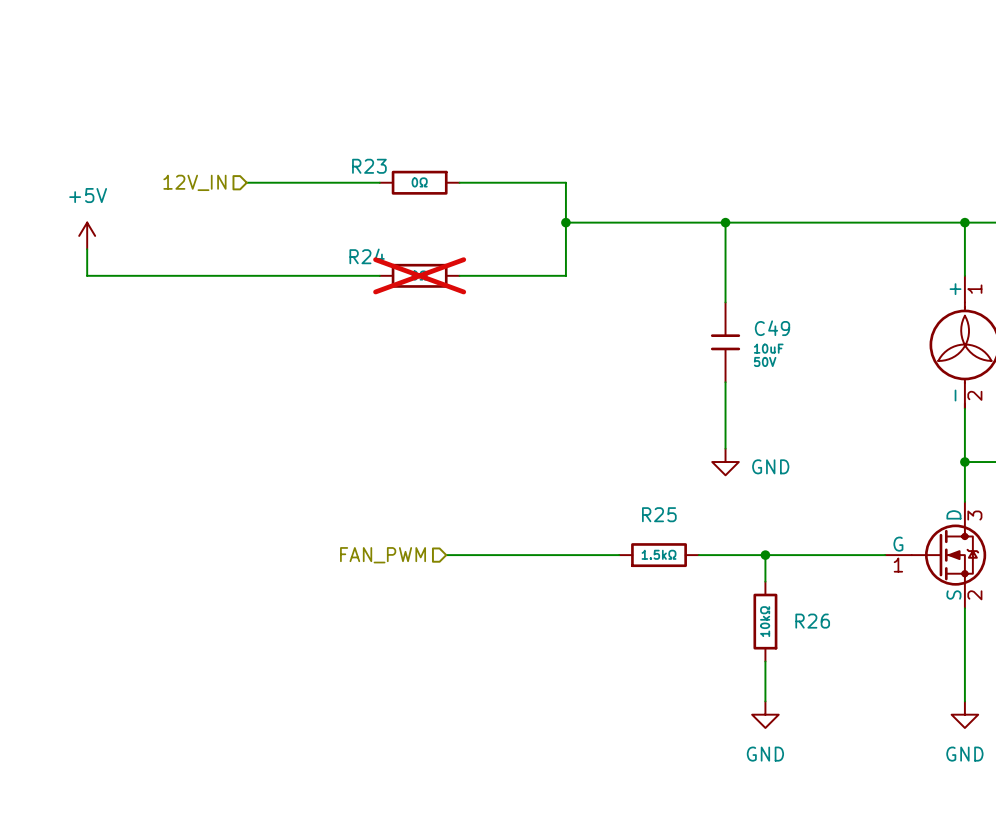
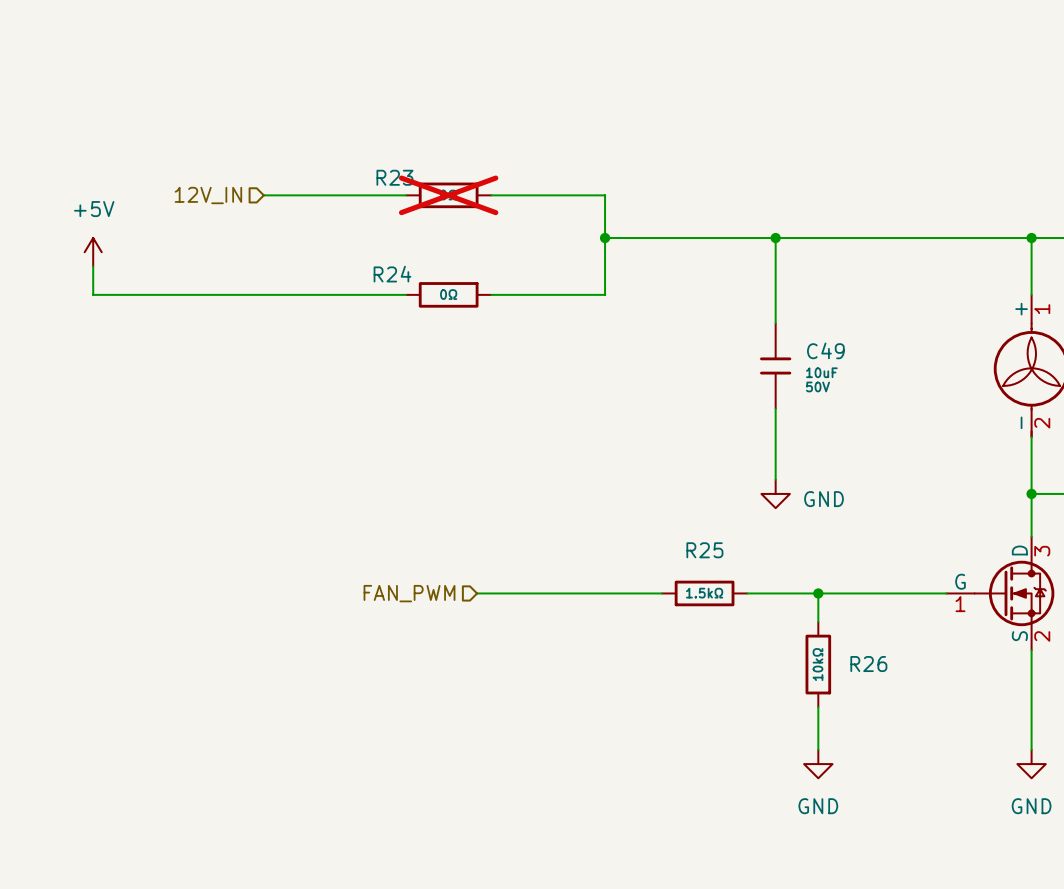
R23 do-not-place cross: none -> (448, 195)
R24 do-not-place cross: (419, 275) -> none

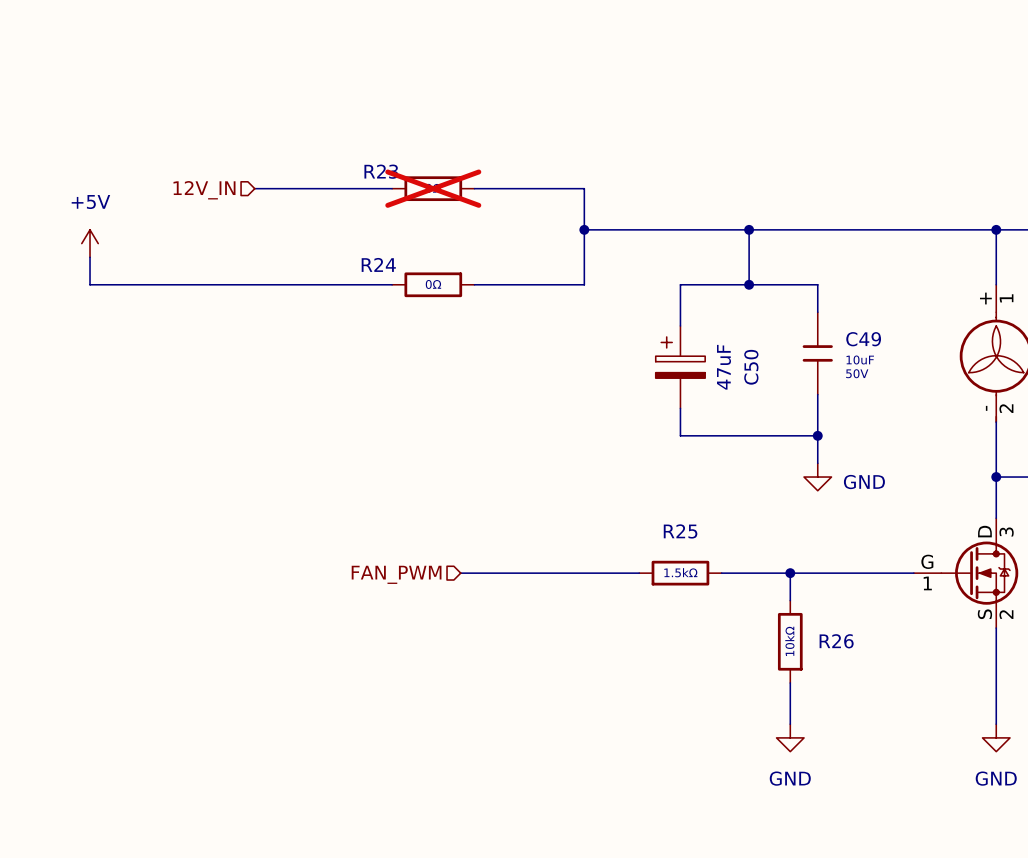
wire: (775, 294) (775, 323) -> none
junction: none -> (749, 284)
wire: none -> (817, 312) (817, 284) (680, 284) (680, 325)
C49 position: (775, 365) -> (817, 353)
C50: none -> 47uF (680, 367)
wire: (775, 408) (775, 479) -> (817, 394) (817, 463)
wire: none -> (680, 408) (680, 435) (817, 435)
junction: none -> (817, 435)
power symbol position: GND (775, 493) -> GND (817, 477)

